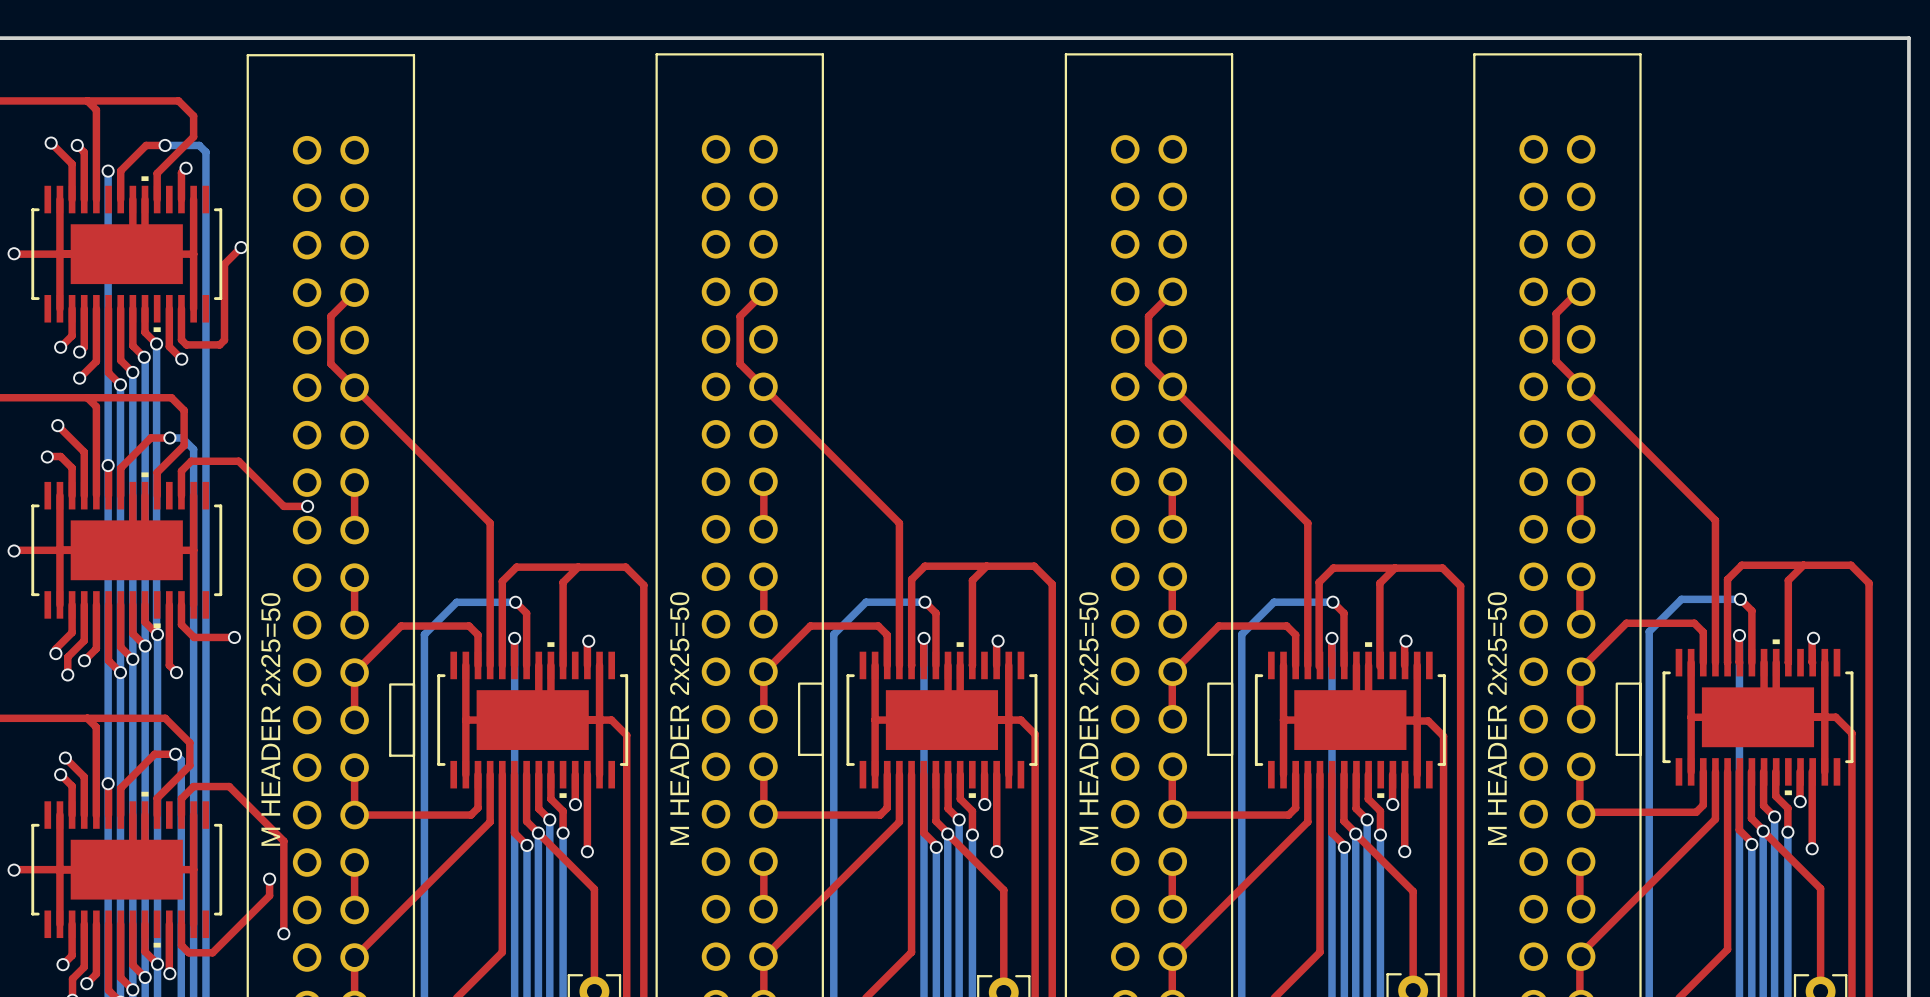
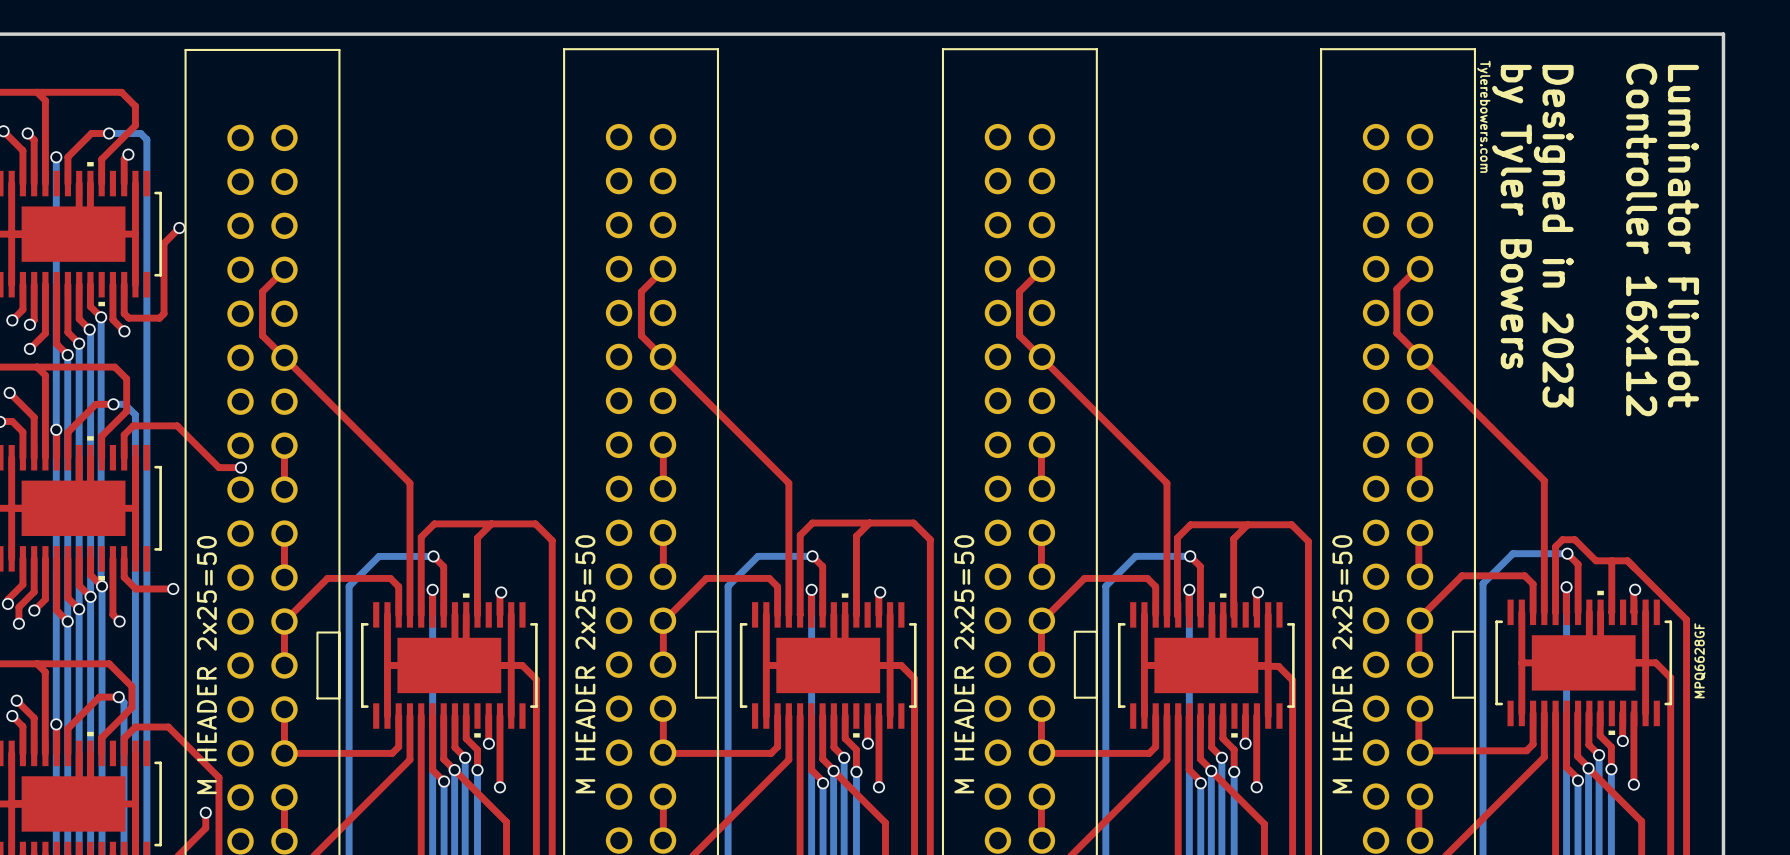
text: none -> Tylerebowers.com (1483, 116)
text: none -> by Tyler Bowers (1511, 217)
text: none -> Designed in 2023 (1553, 236)
text: none -> Controller 16x112 (1641, 239)
text: none -> Luminator Flipdot (1679, 236)
top track: (1803, 565) (1788, 580) (1788, 607) -> none
top track: (1727, 591) (1727, 579) (1741, 565) (1851, 565) (1869, 583) (1869, 670) -> (1555, 546) (1562, 539) (1574, 539) (1595, 560) (1627, 560) (1686, 619)
text: none -> MPQ6628GF (1700, 660)

